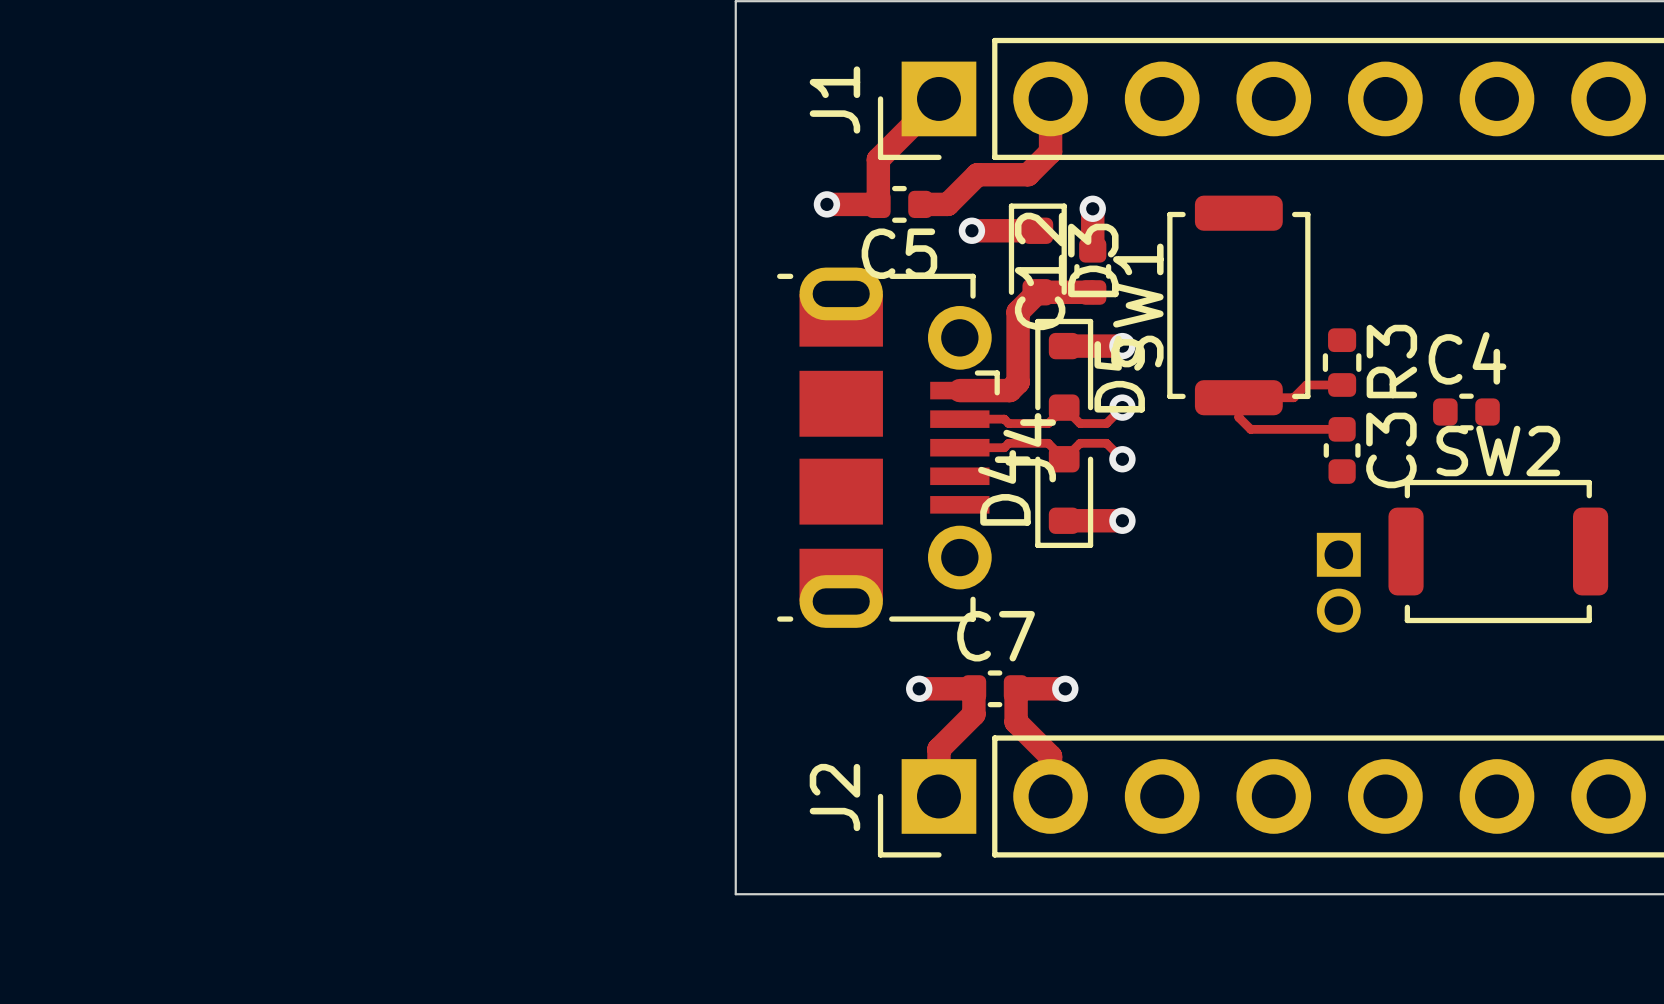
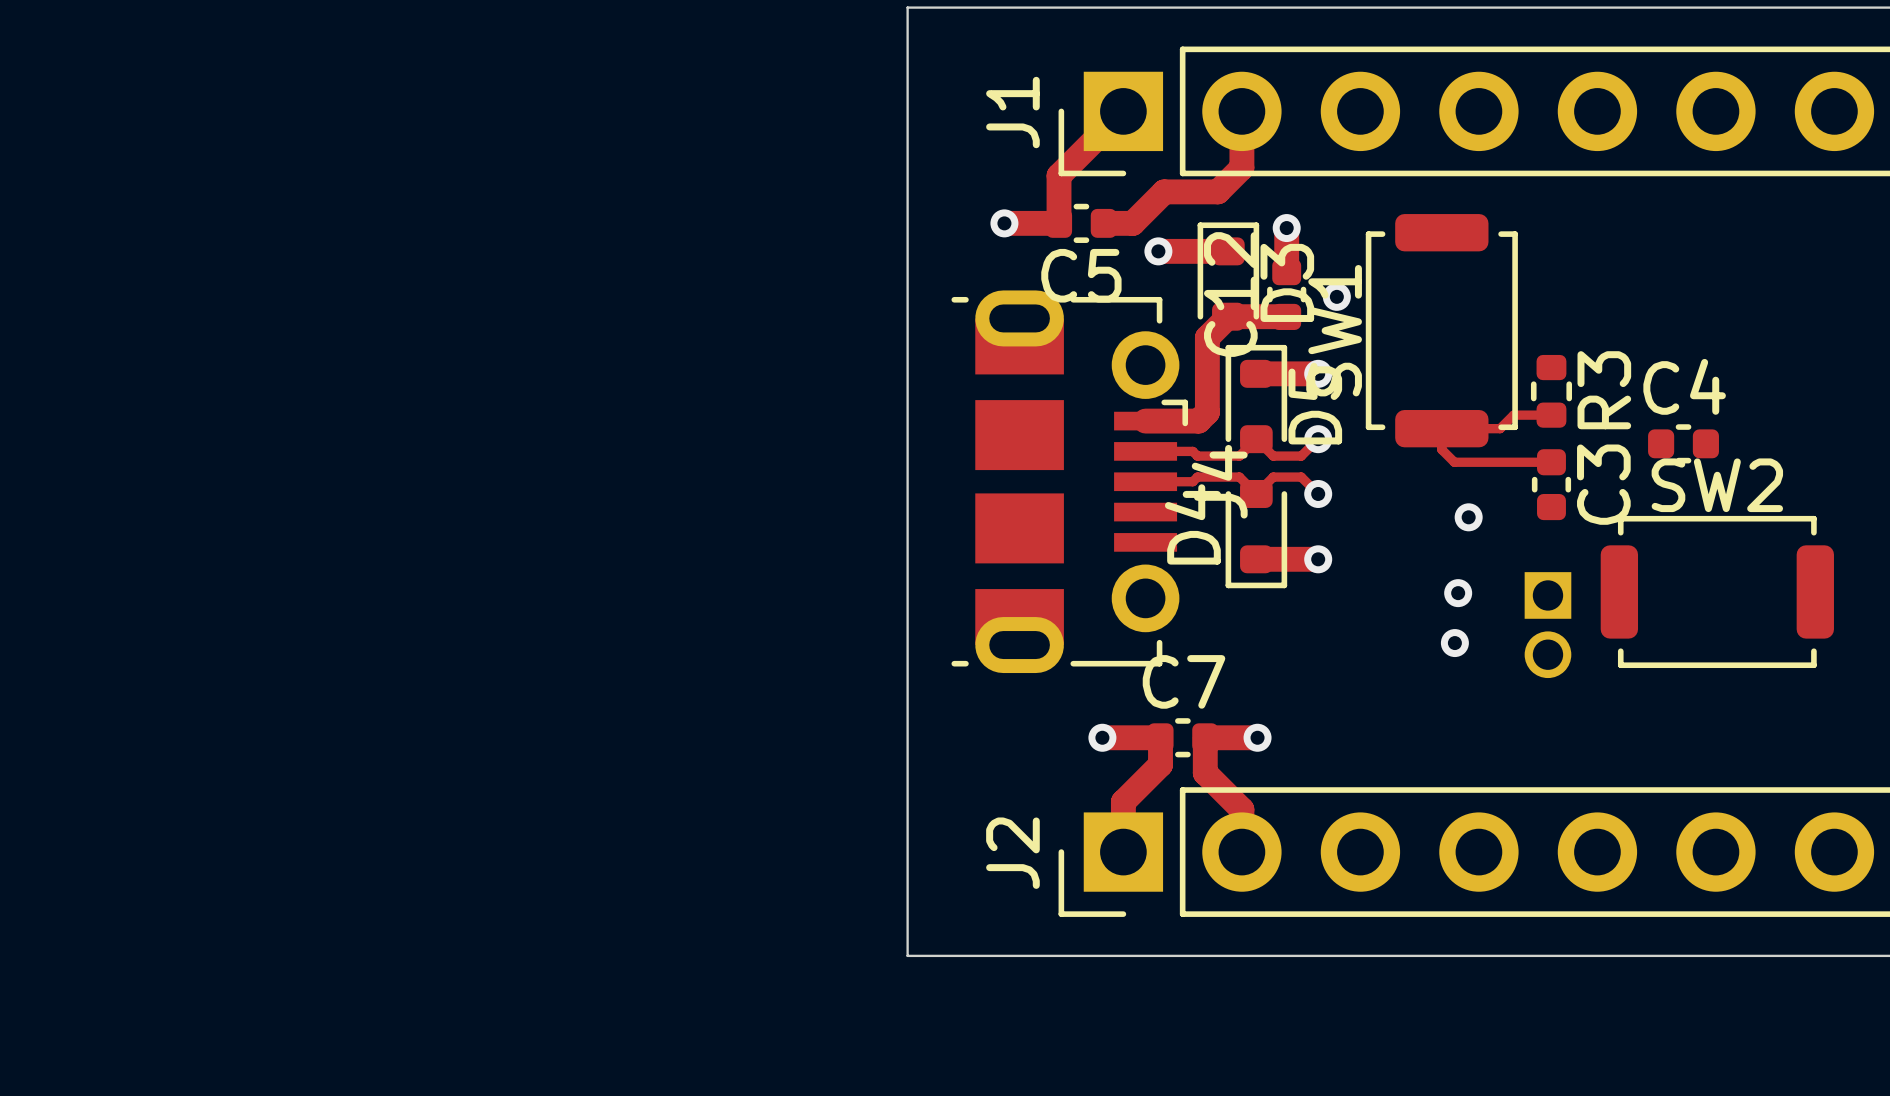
via: none -> (1336, 296)
via: none -> (1468, 517)
via: none -> (1458, 593)
via: none -> (1454, 643)

